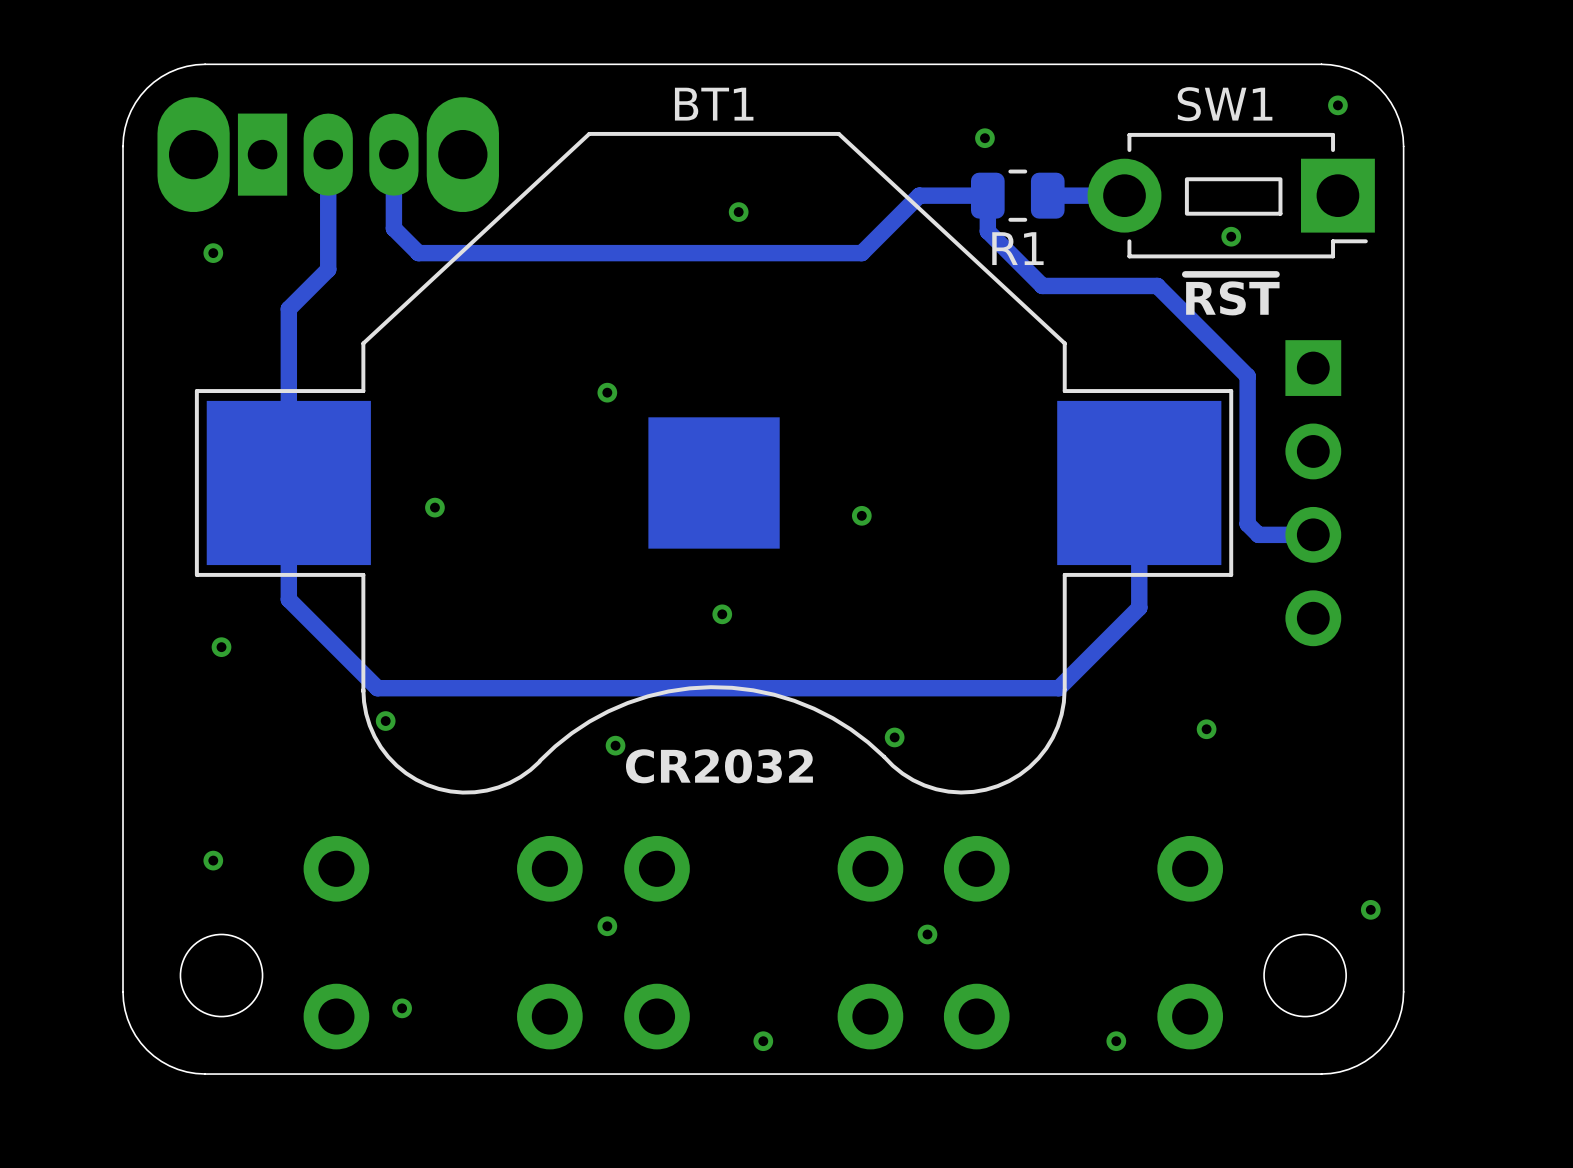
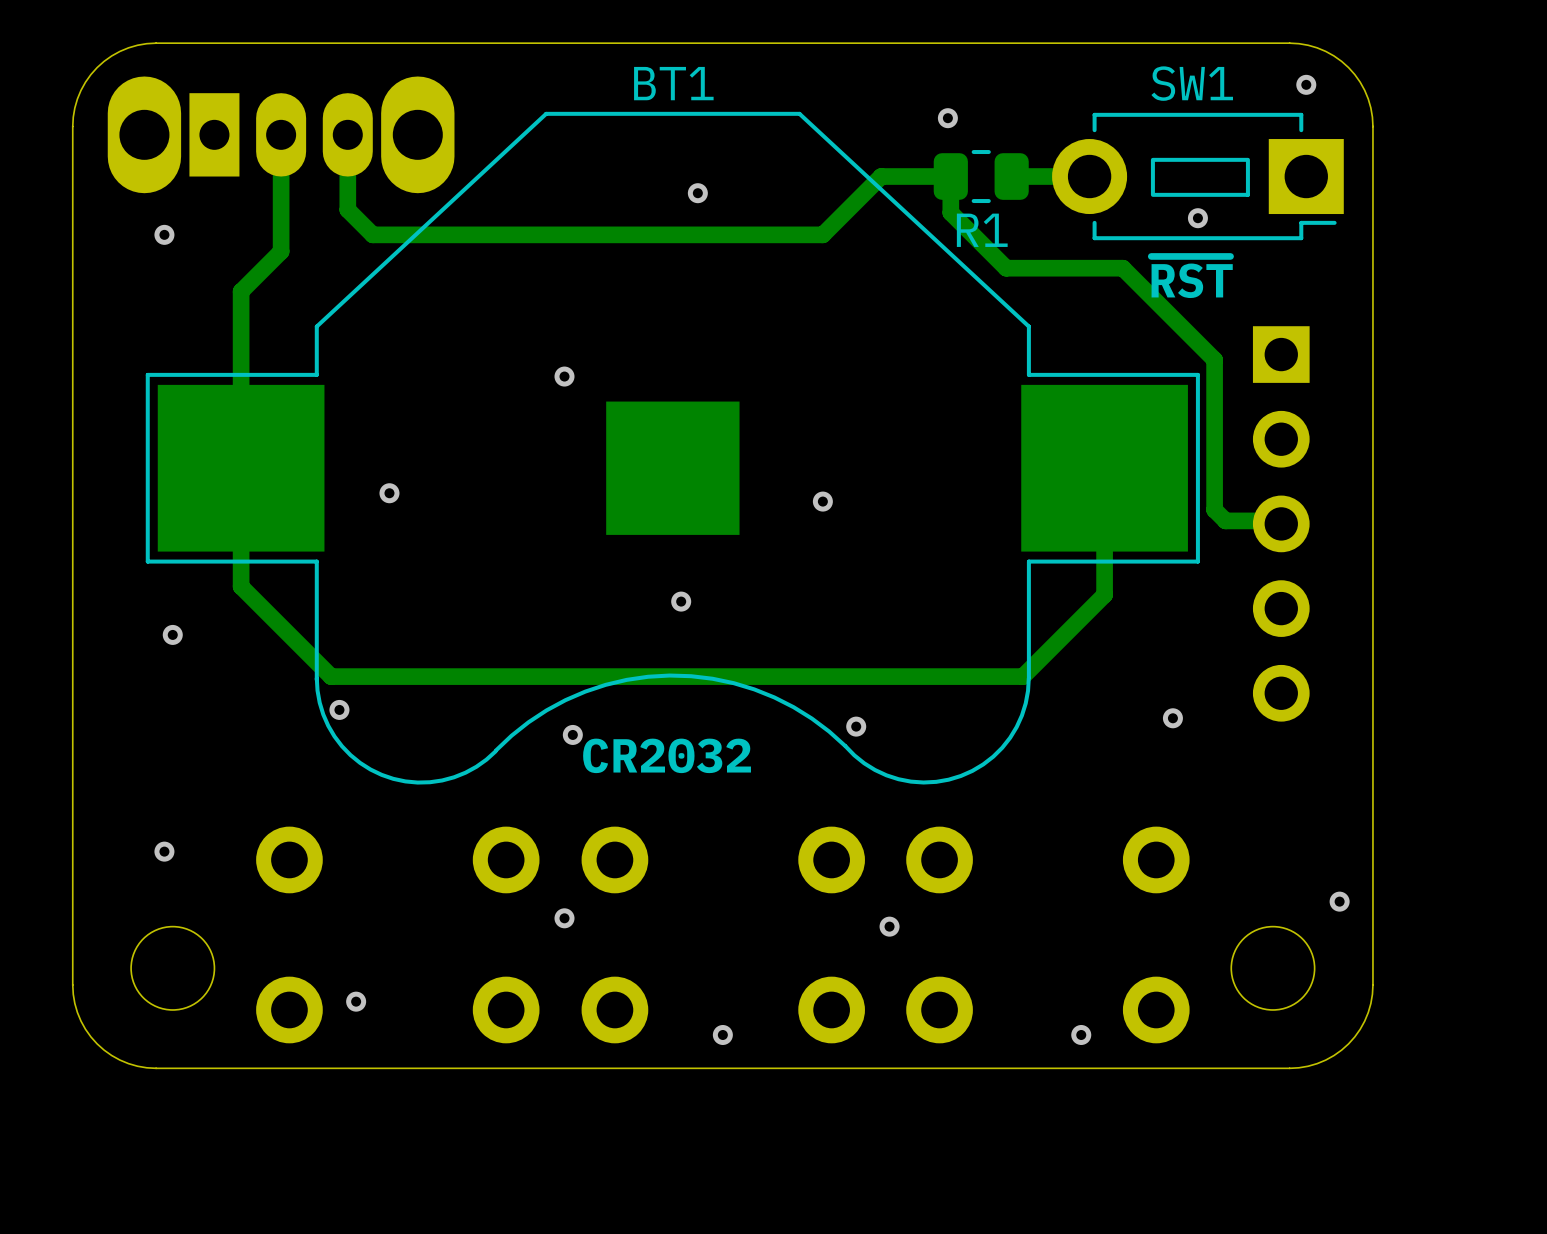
part: (1313, 493) -> none
part: none -> (1281, 523)

